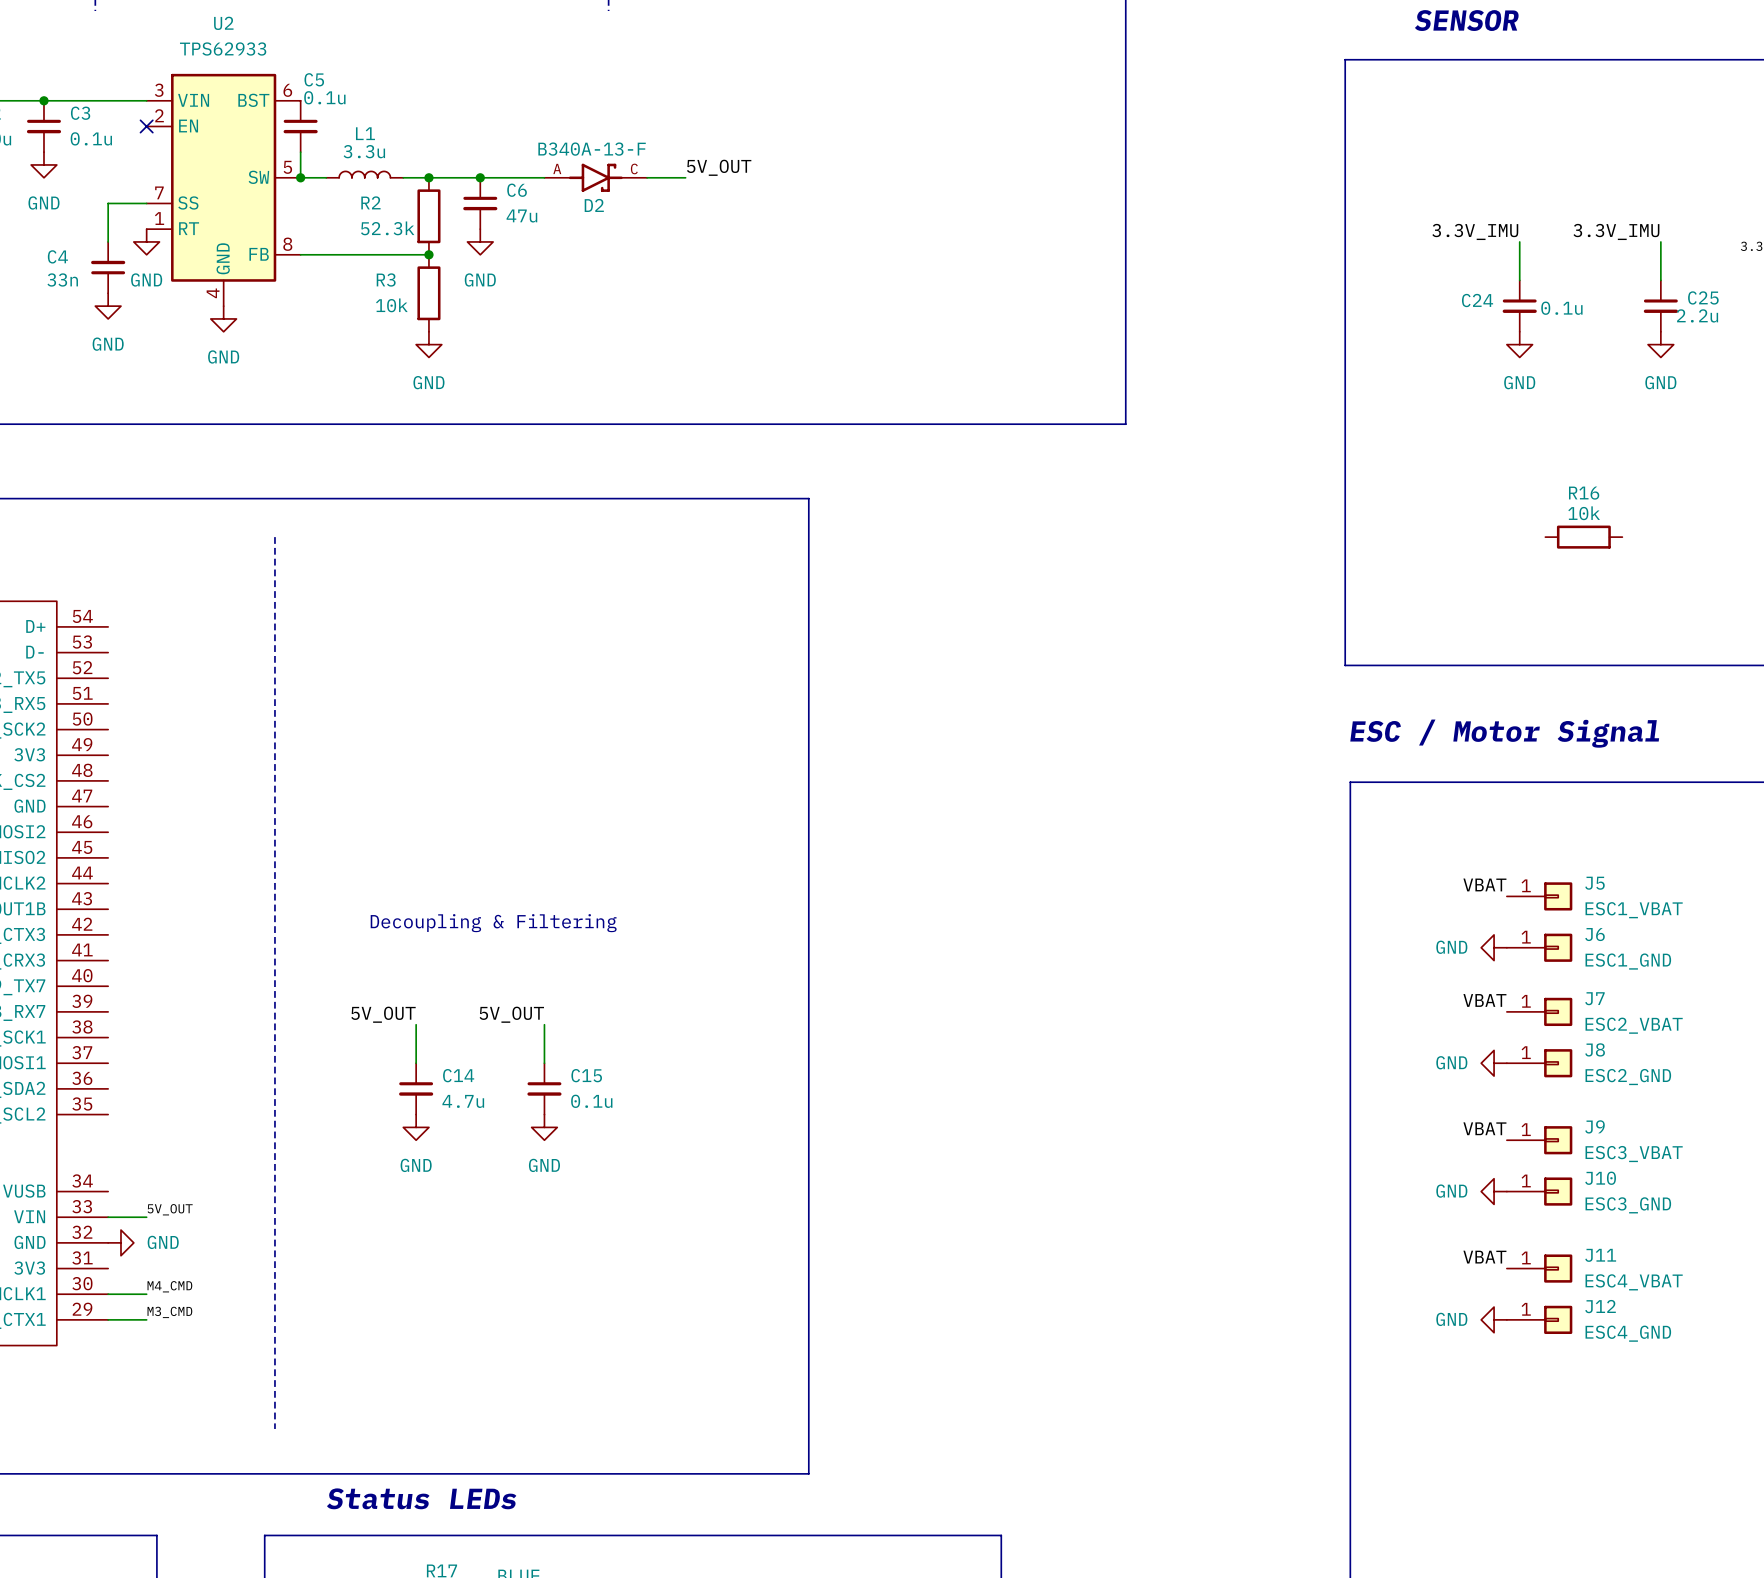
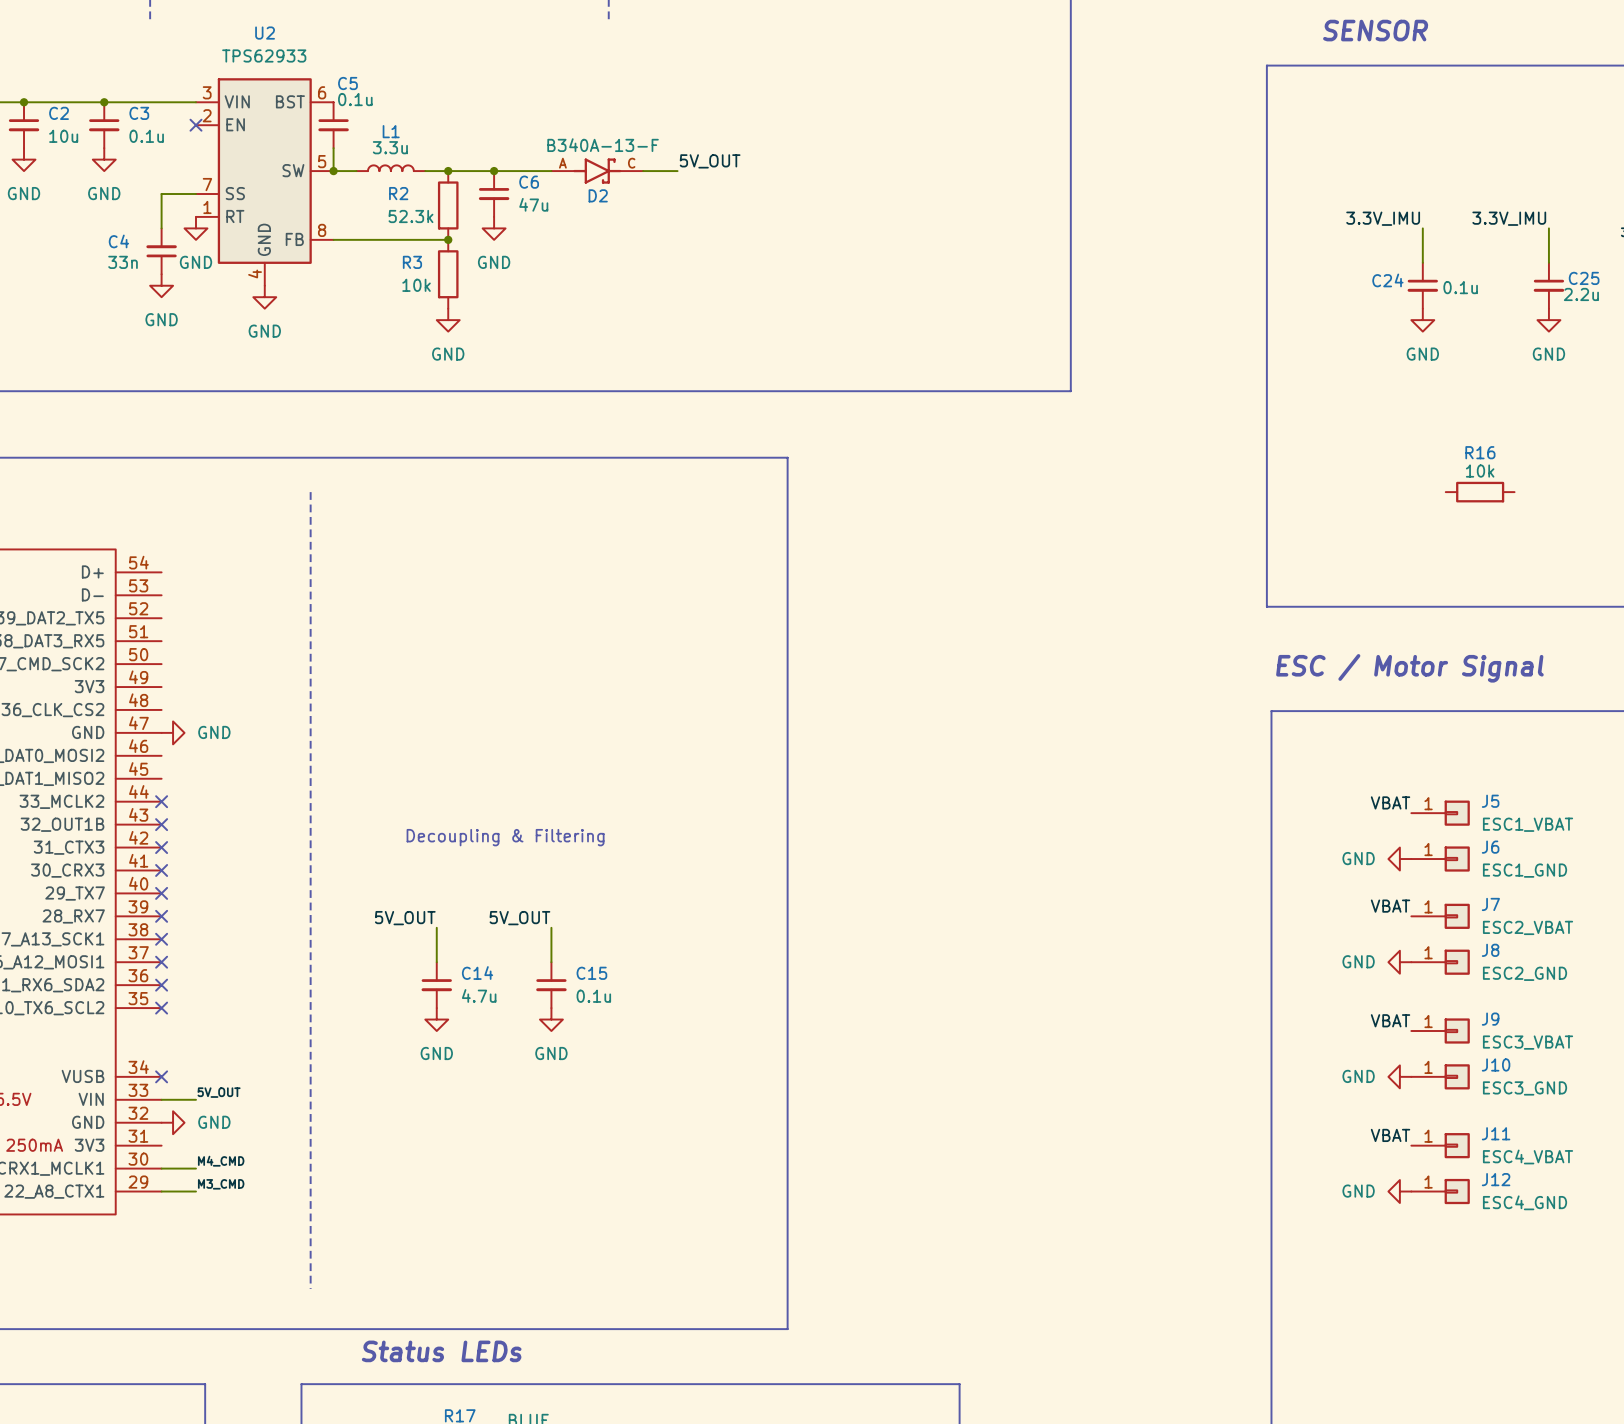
power symbol: none -> GND (173, 732)
no-connect mark: none -> (161, 801)
no-connect mark: none -> (161, 824)
no-connect mark: none -> (161, 847)
no-connect mark: none -> (161, 870)
no-connect mark: none -> (161, 893)
no-connect mark: none -> (161, 916)
no-connect mark: none -> (161, 939)
no-connect mark: none -> (161, 962)
no-connect mark: none -> (161, 985)
no-connect mark: none -> (161, 1008)
no-connect mark: none -> (161, 1076)

